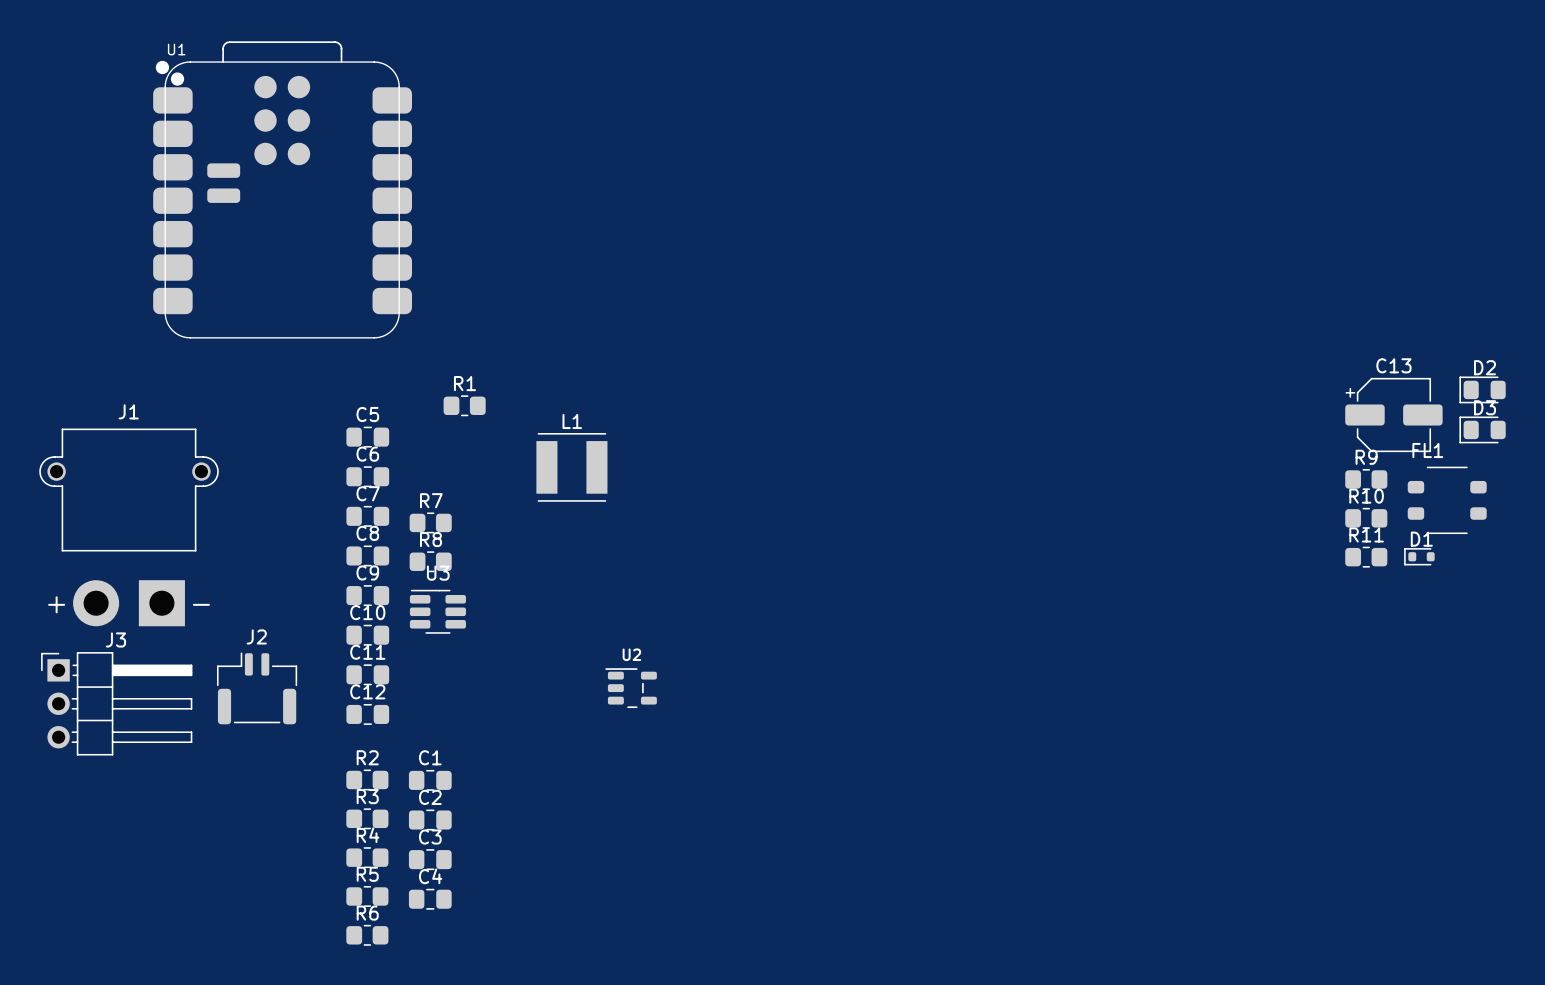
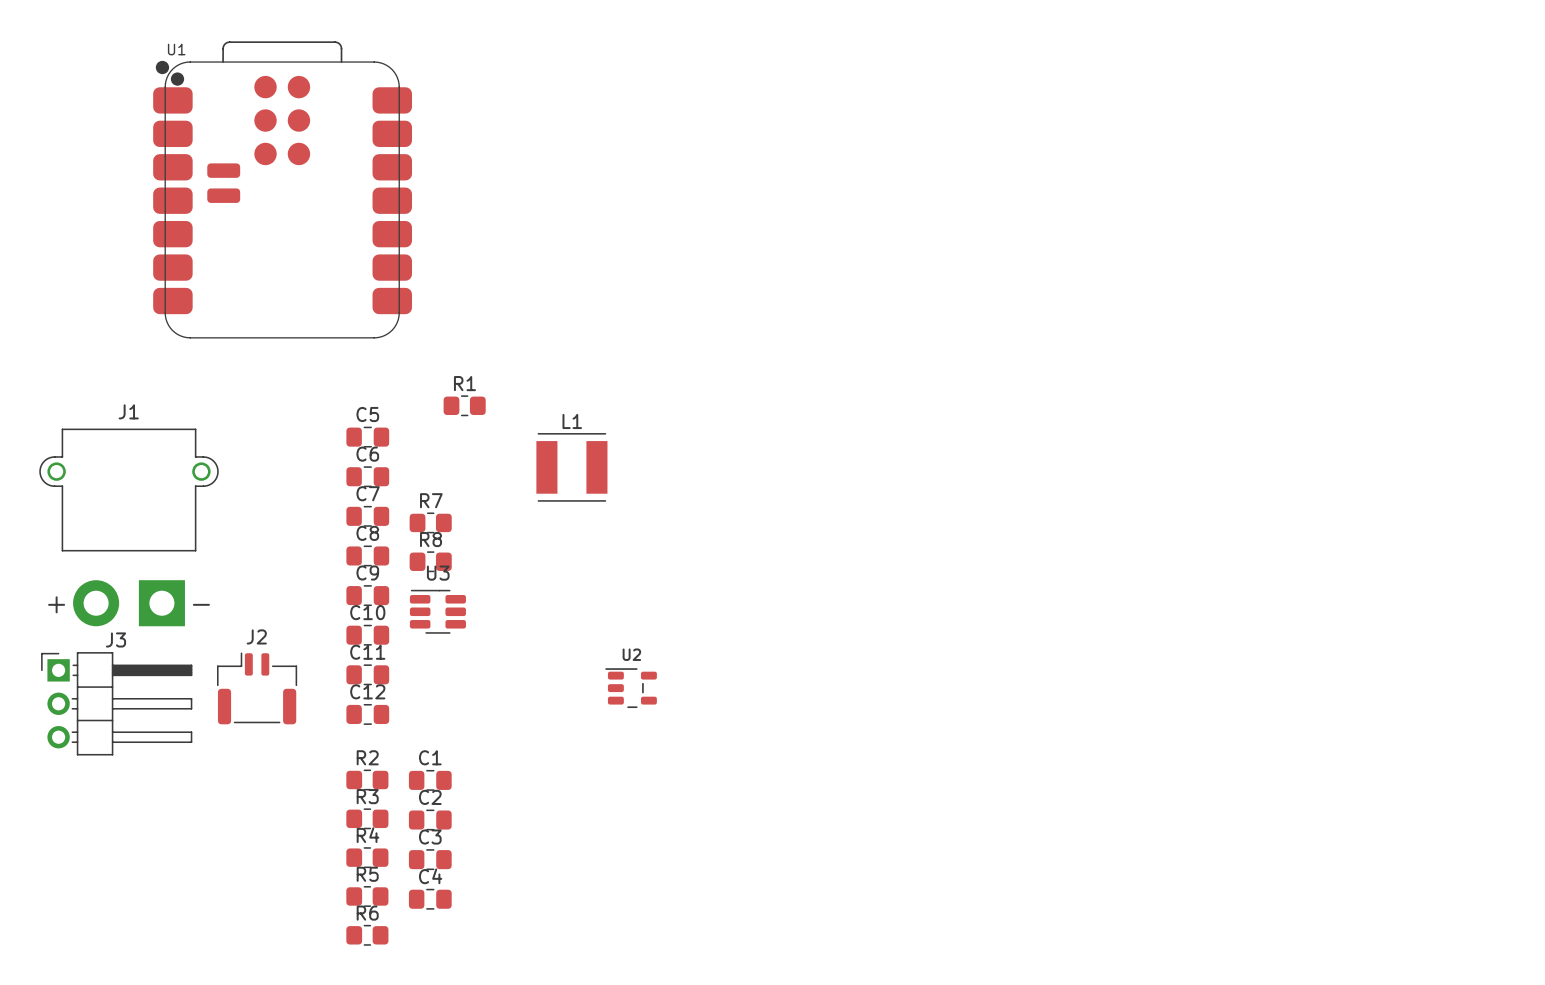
D2: (1482, 389) -> none
C13: (1393, 415) -> none
D3: (1482, 429) -> none
R9: (1366, 479) -> none
FL1: (1447, 500) -> none
R10: (1366, 518) -> none
D1: (1419, 556) -> none
R11: (1366, 557) -> none

